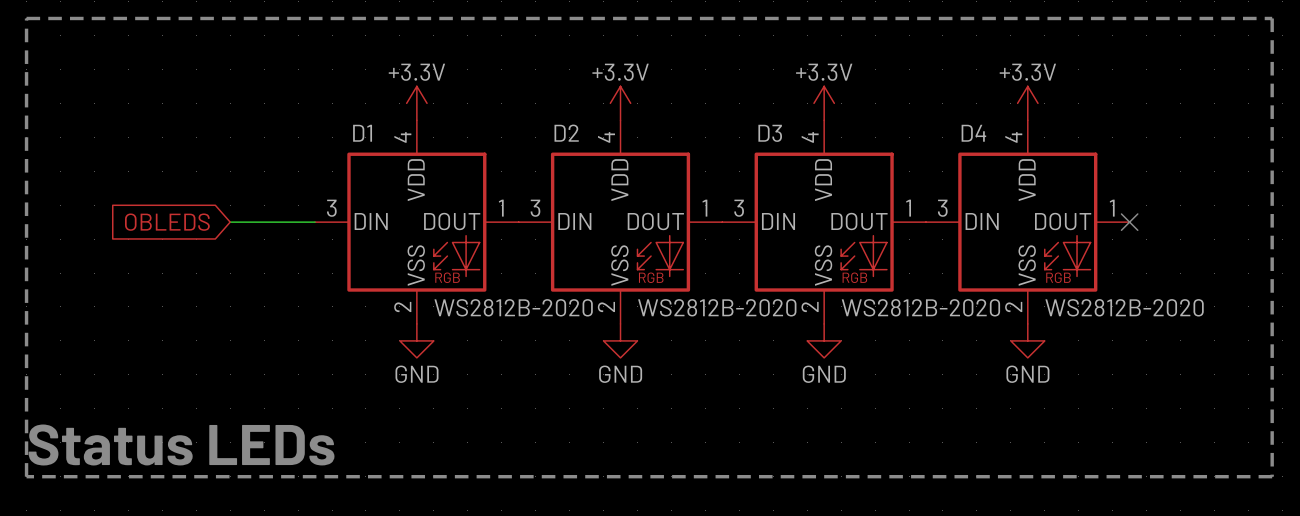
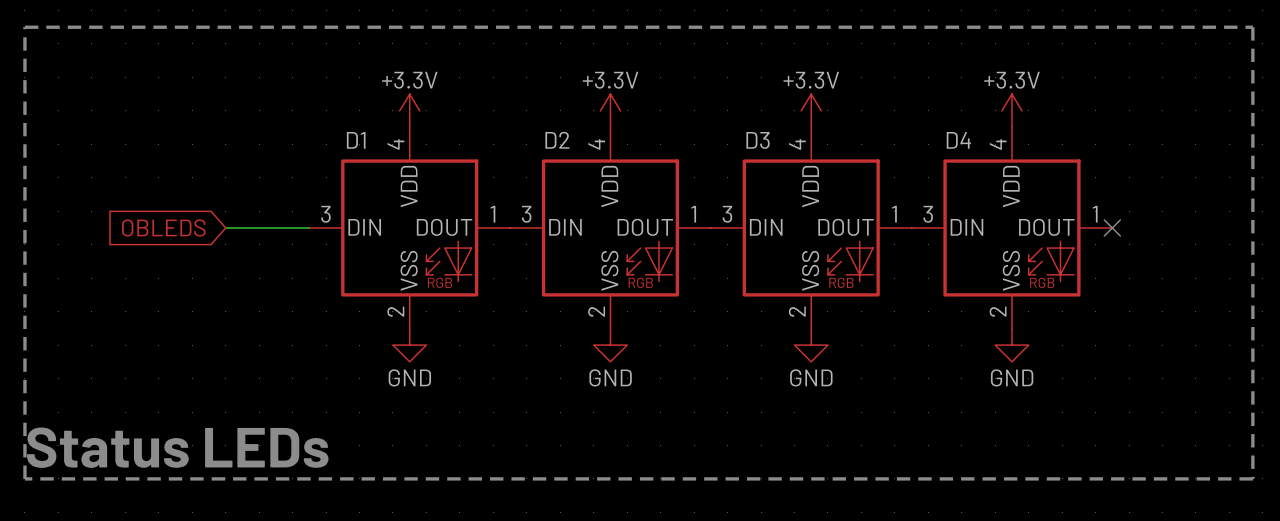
D1 value: WS2812B-2020 (513, 307) -> none
D2 value: WS2812B-2020 (717, 307) -> none
D3 value: WS2812B-2020 (920, 307) -> none
D4 value: WS2812B-2020 (1124, 307) -> none

